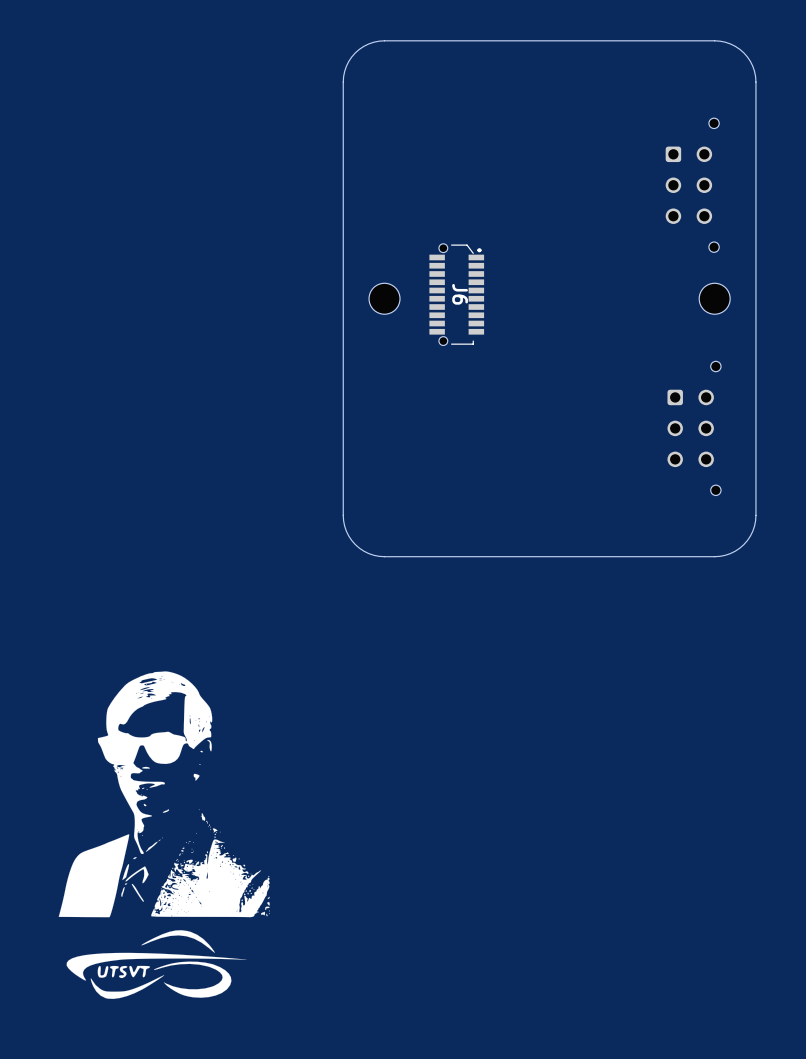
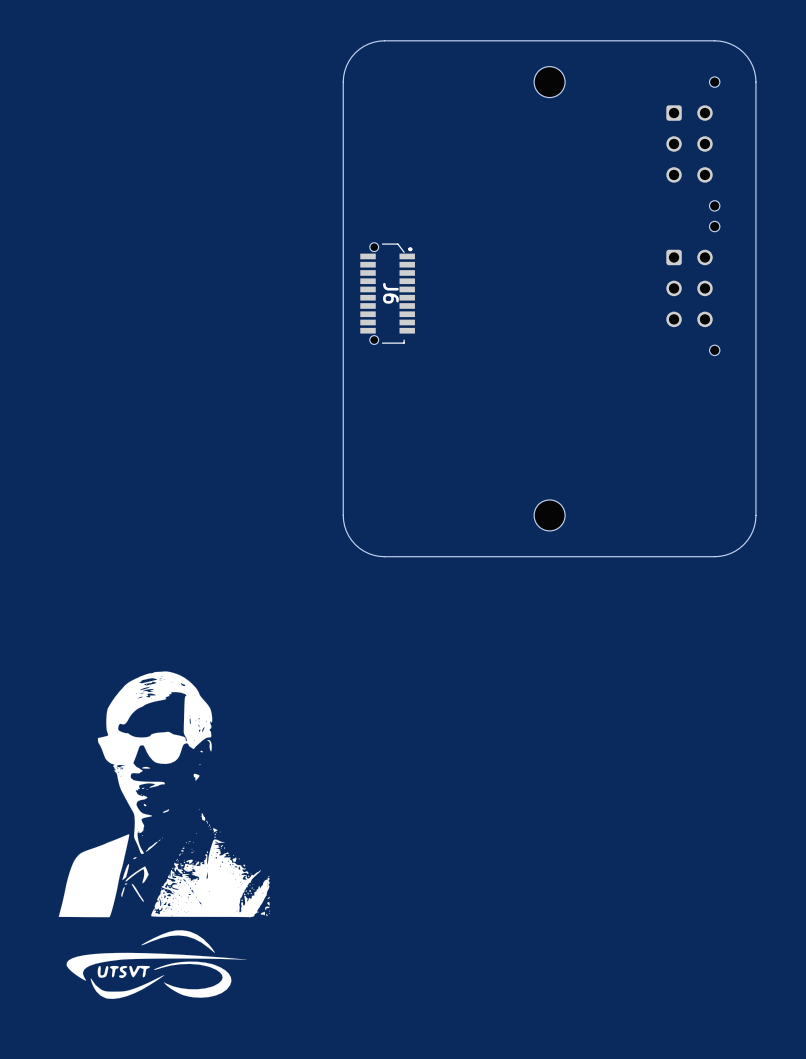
part: none -> (549, 82)
part position: (692, 185) -> (693, 143)
part: none -> (693, 288)
J6 position: (456, 294) -> (387, 293)
part: (384, 298) -> none
part: (714, 298) -> none
part: (694, 428) -> none
part: none -> (549, 515)

